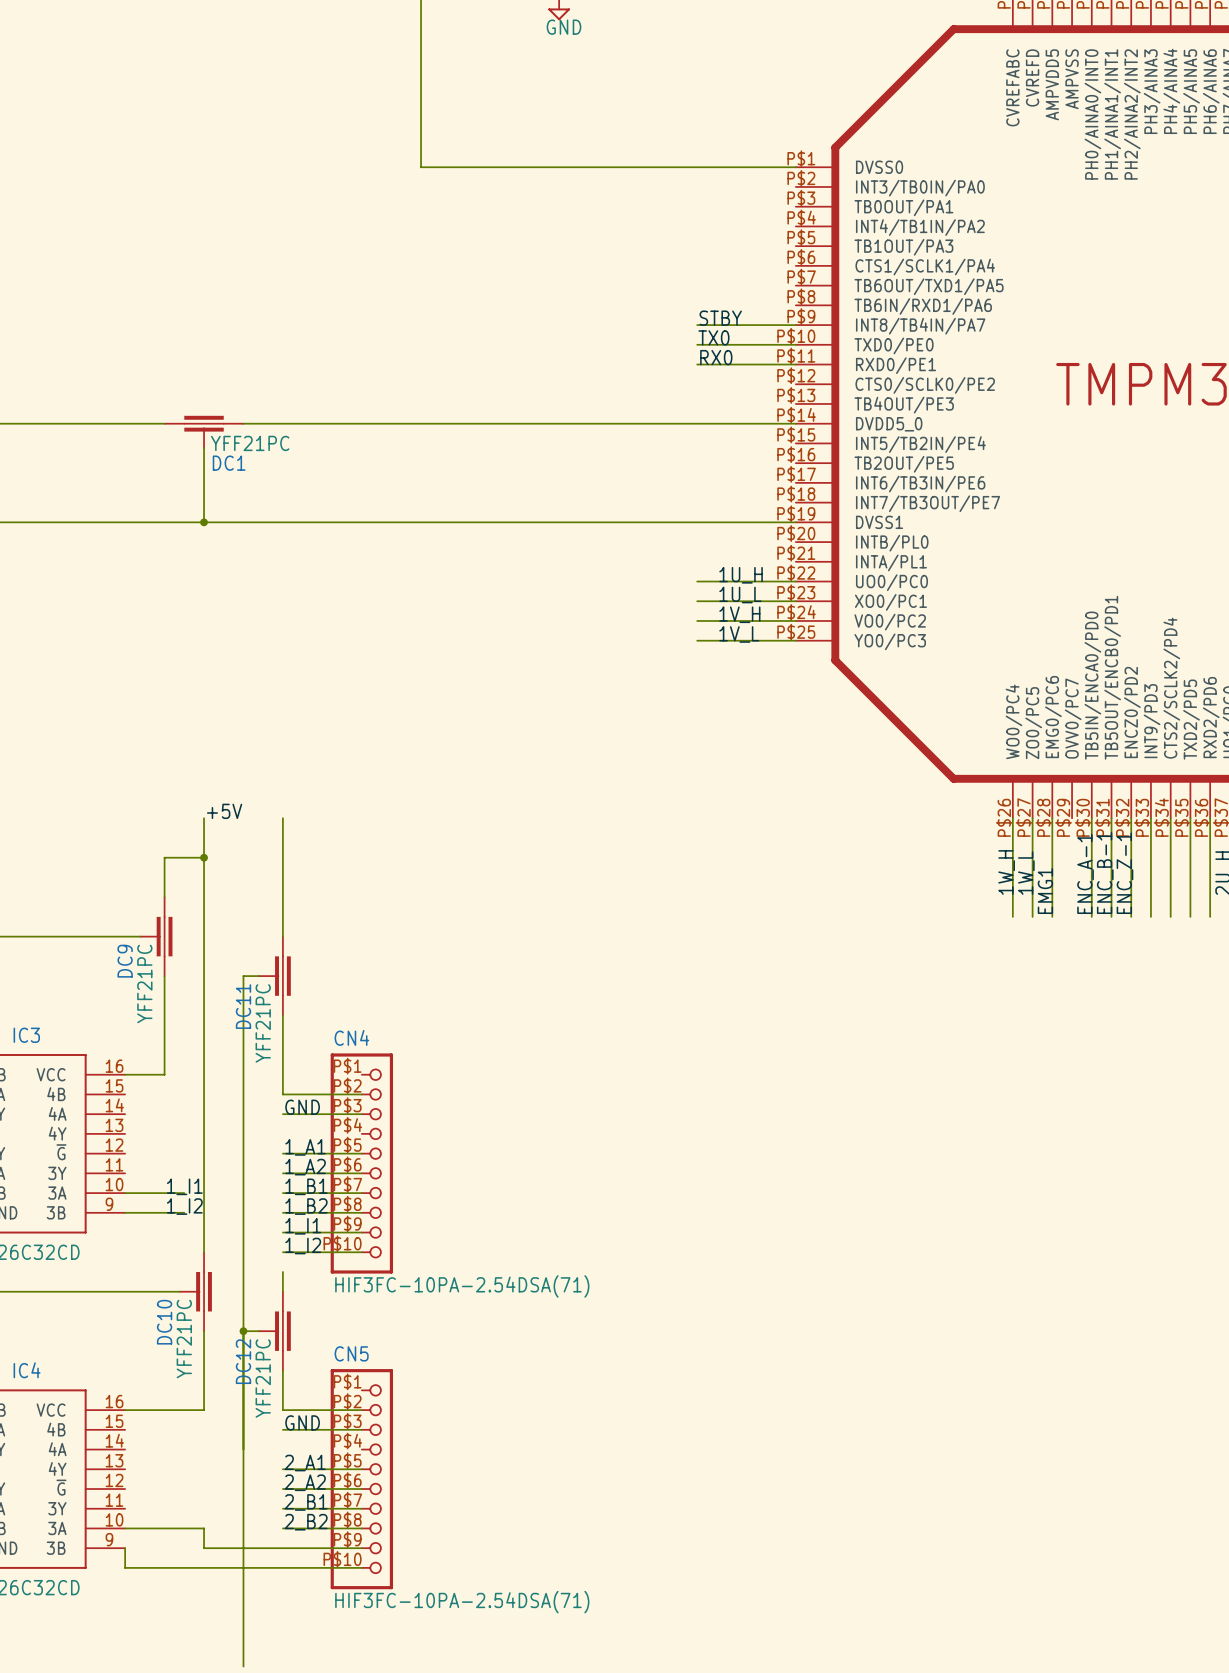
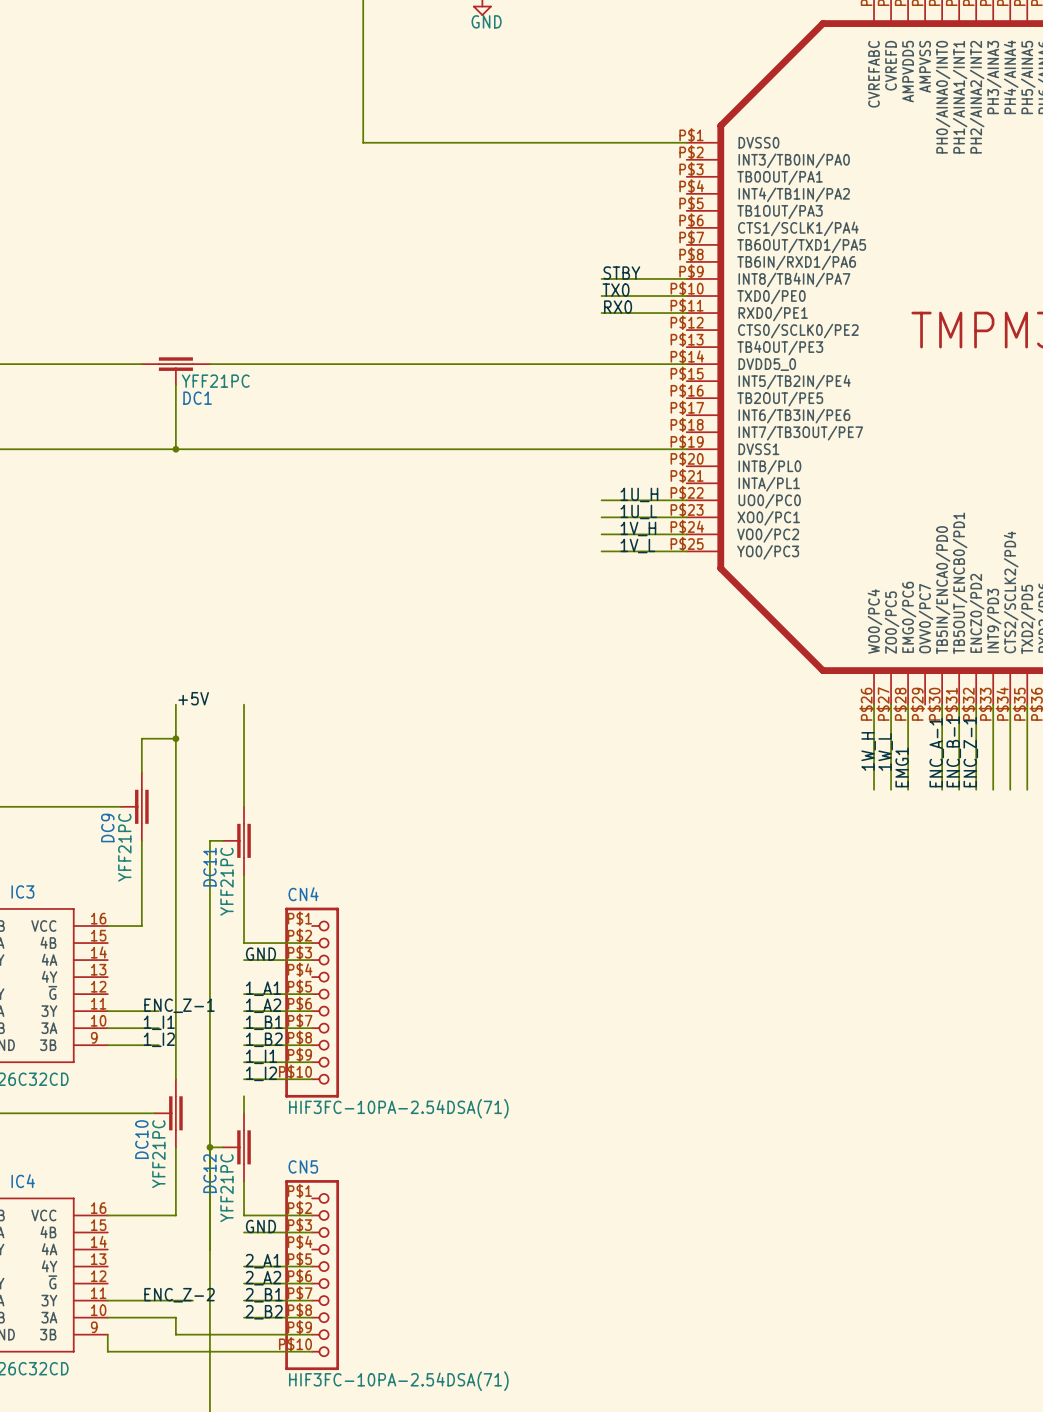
label: none -> ENC_Z-1 (179, 1005)
wire: none -> (107, 1011) (158, 1011)
label: none -> ENC_Z-2 (179, 1295)
wire: none -> (107, 1300) (192, 1300)

